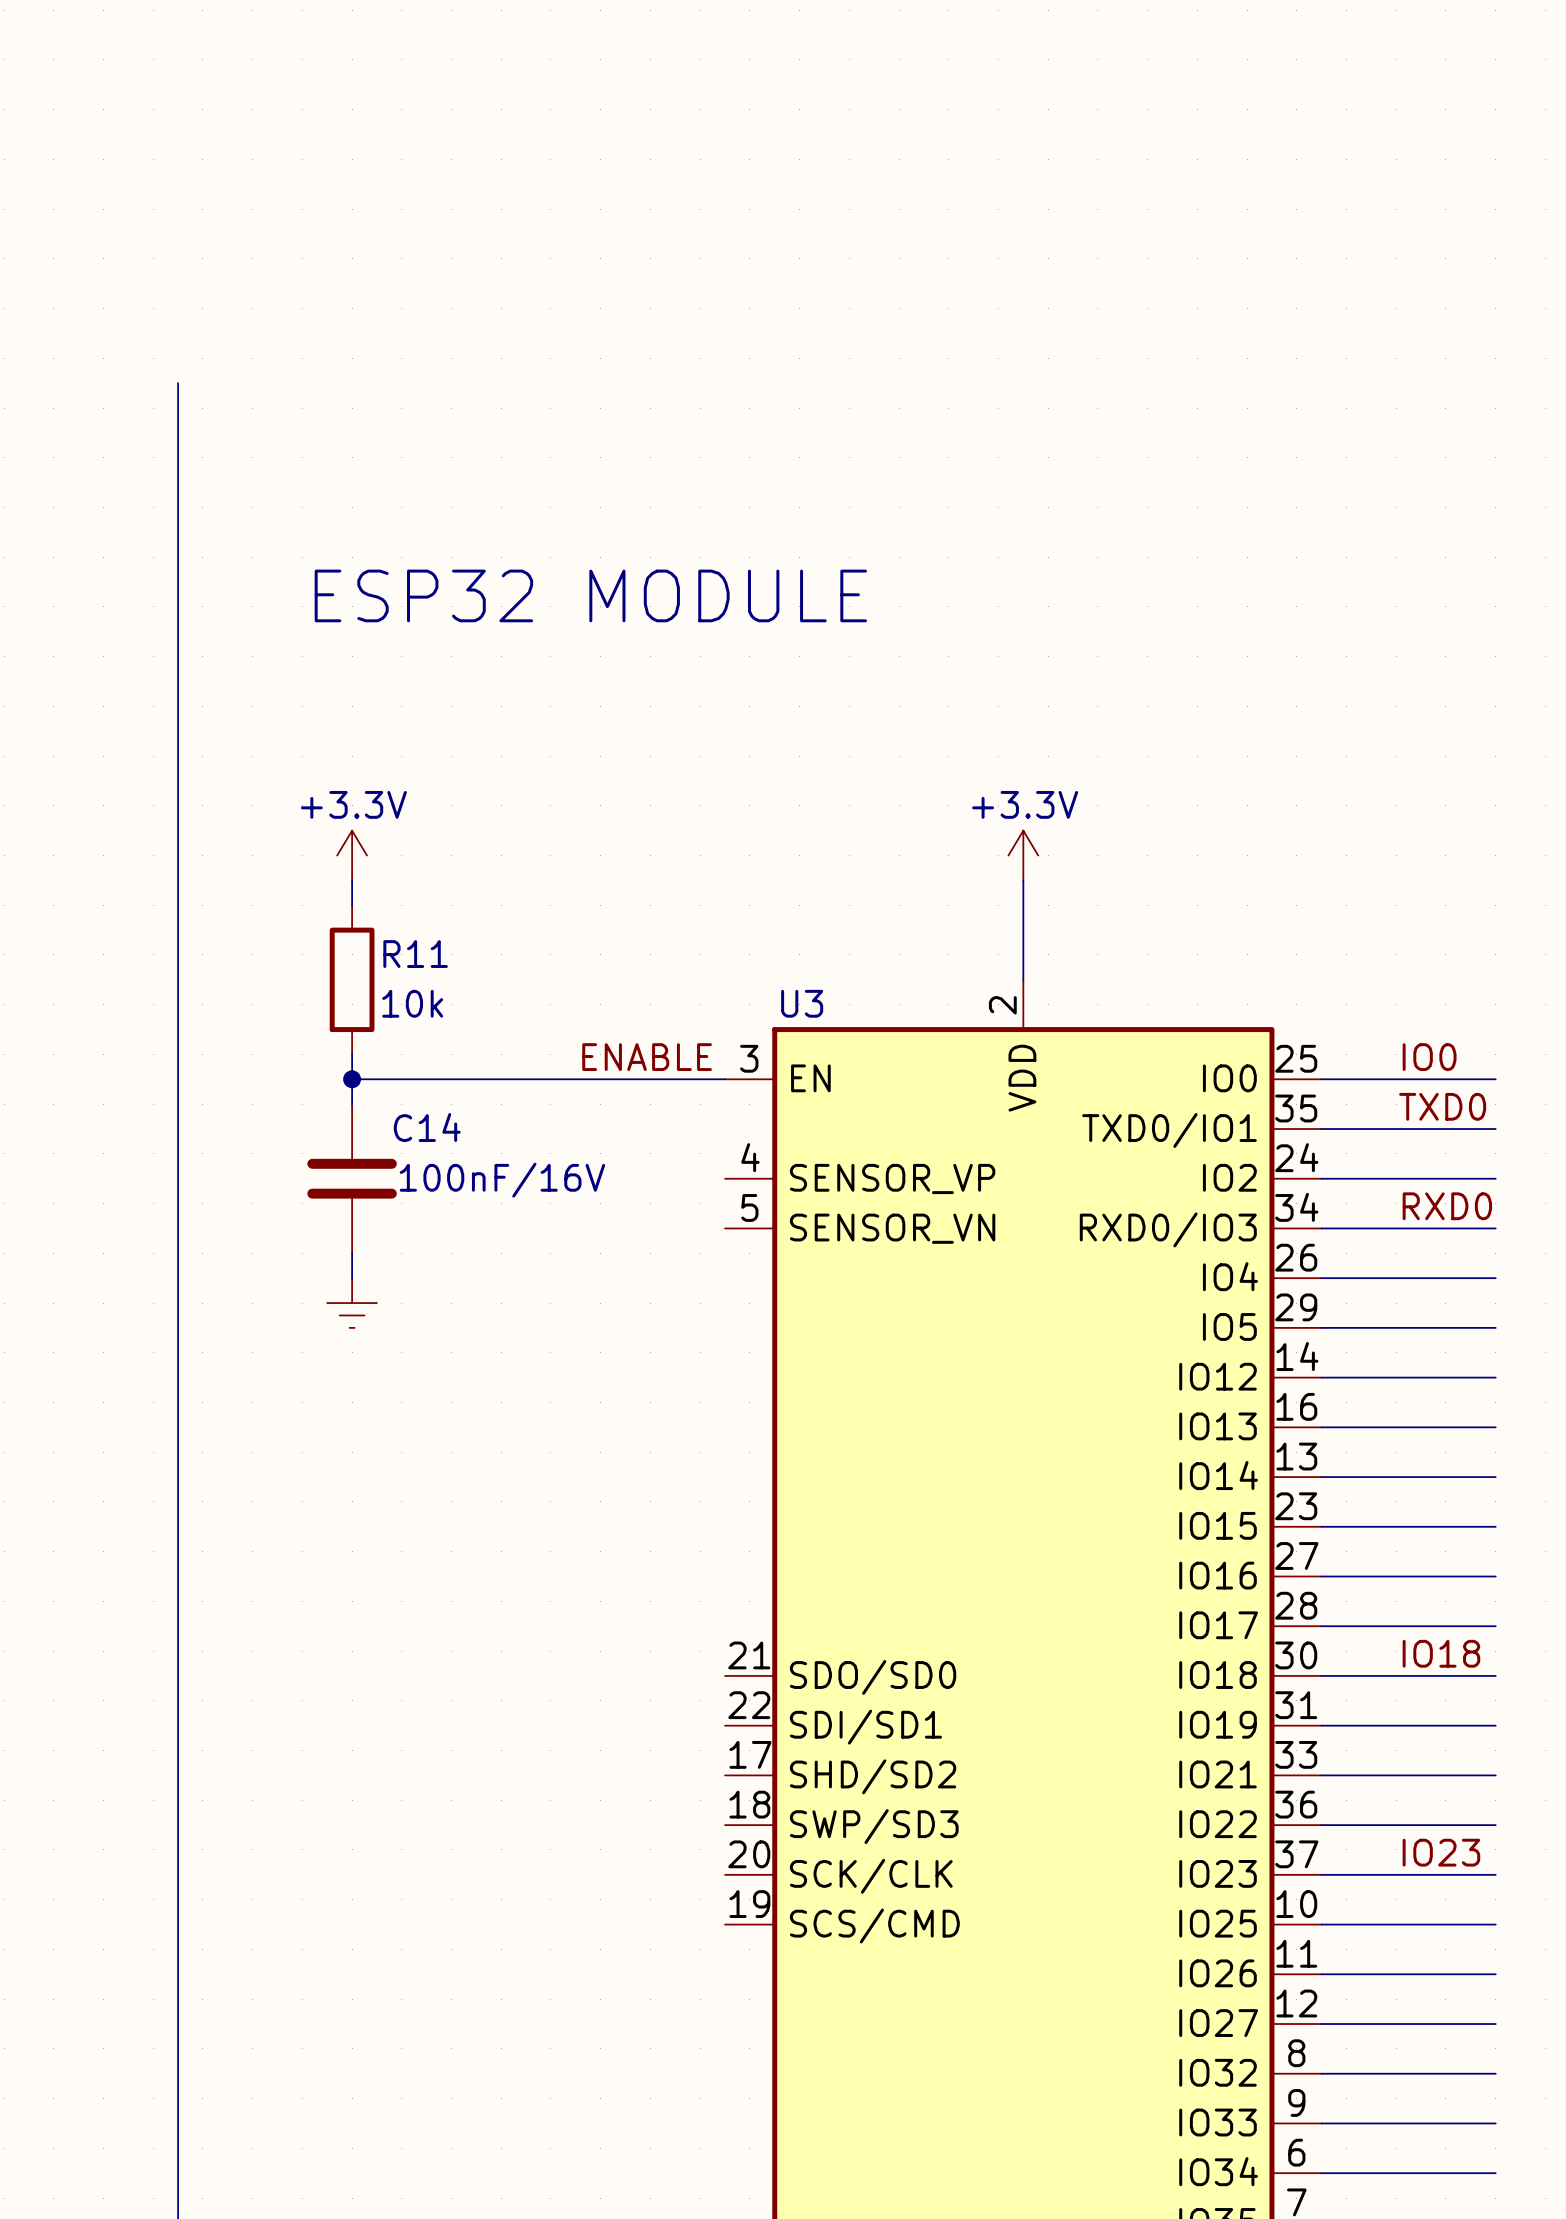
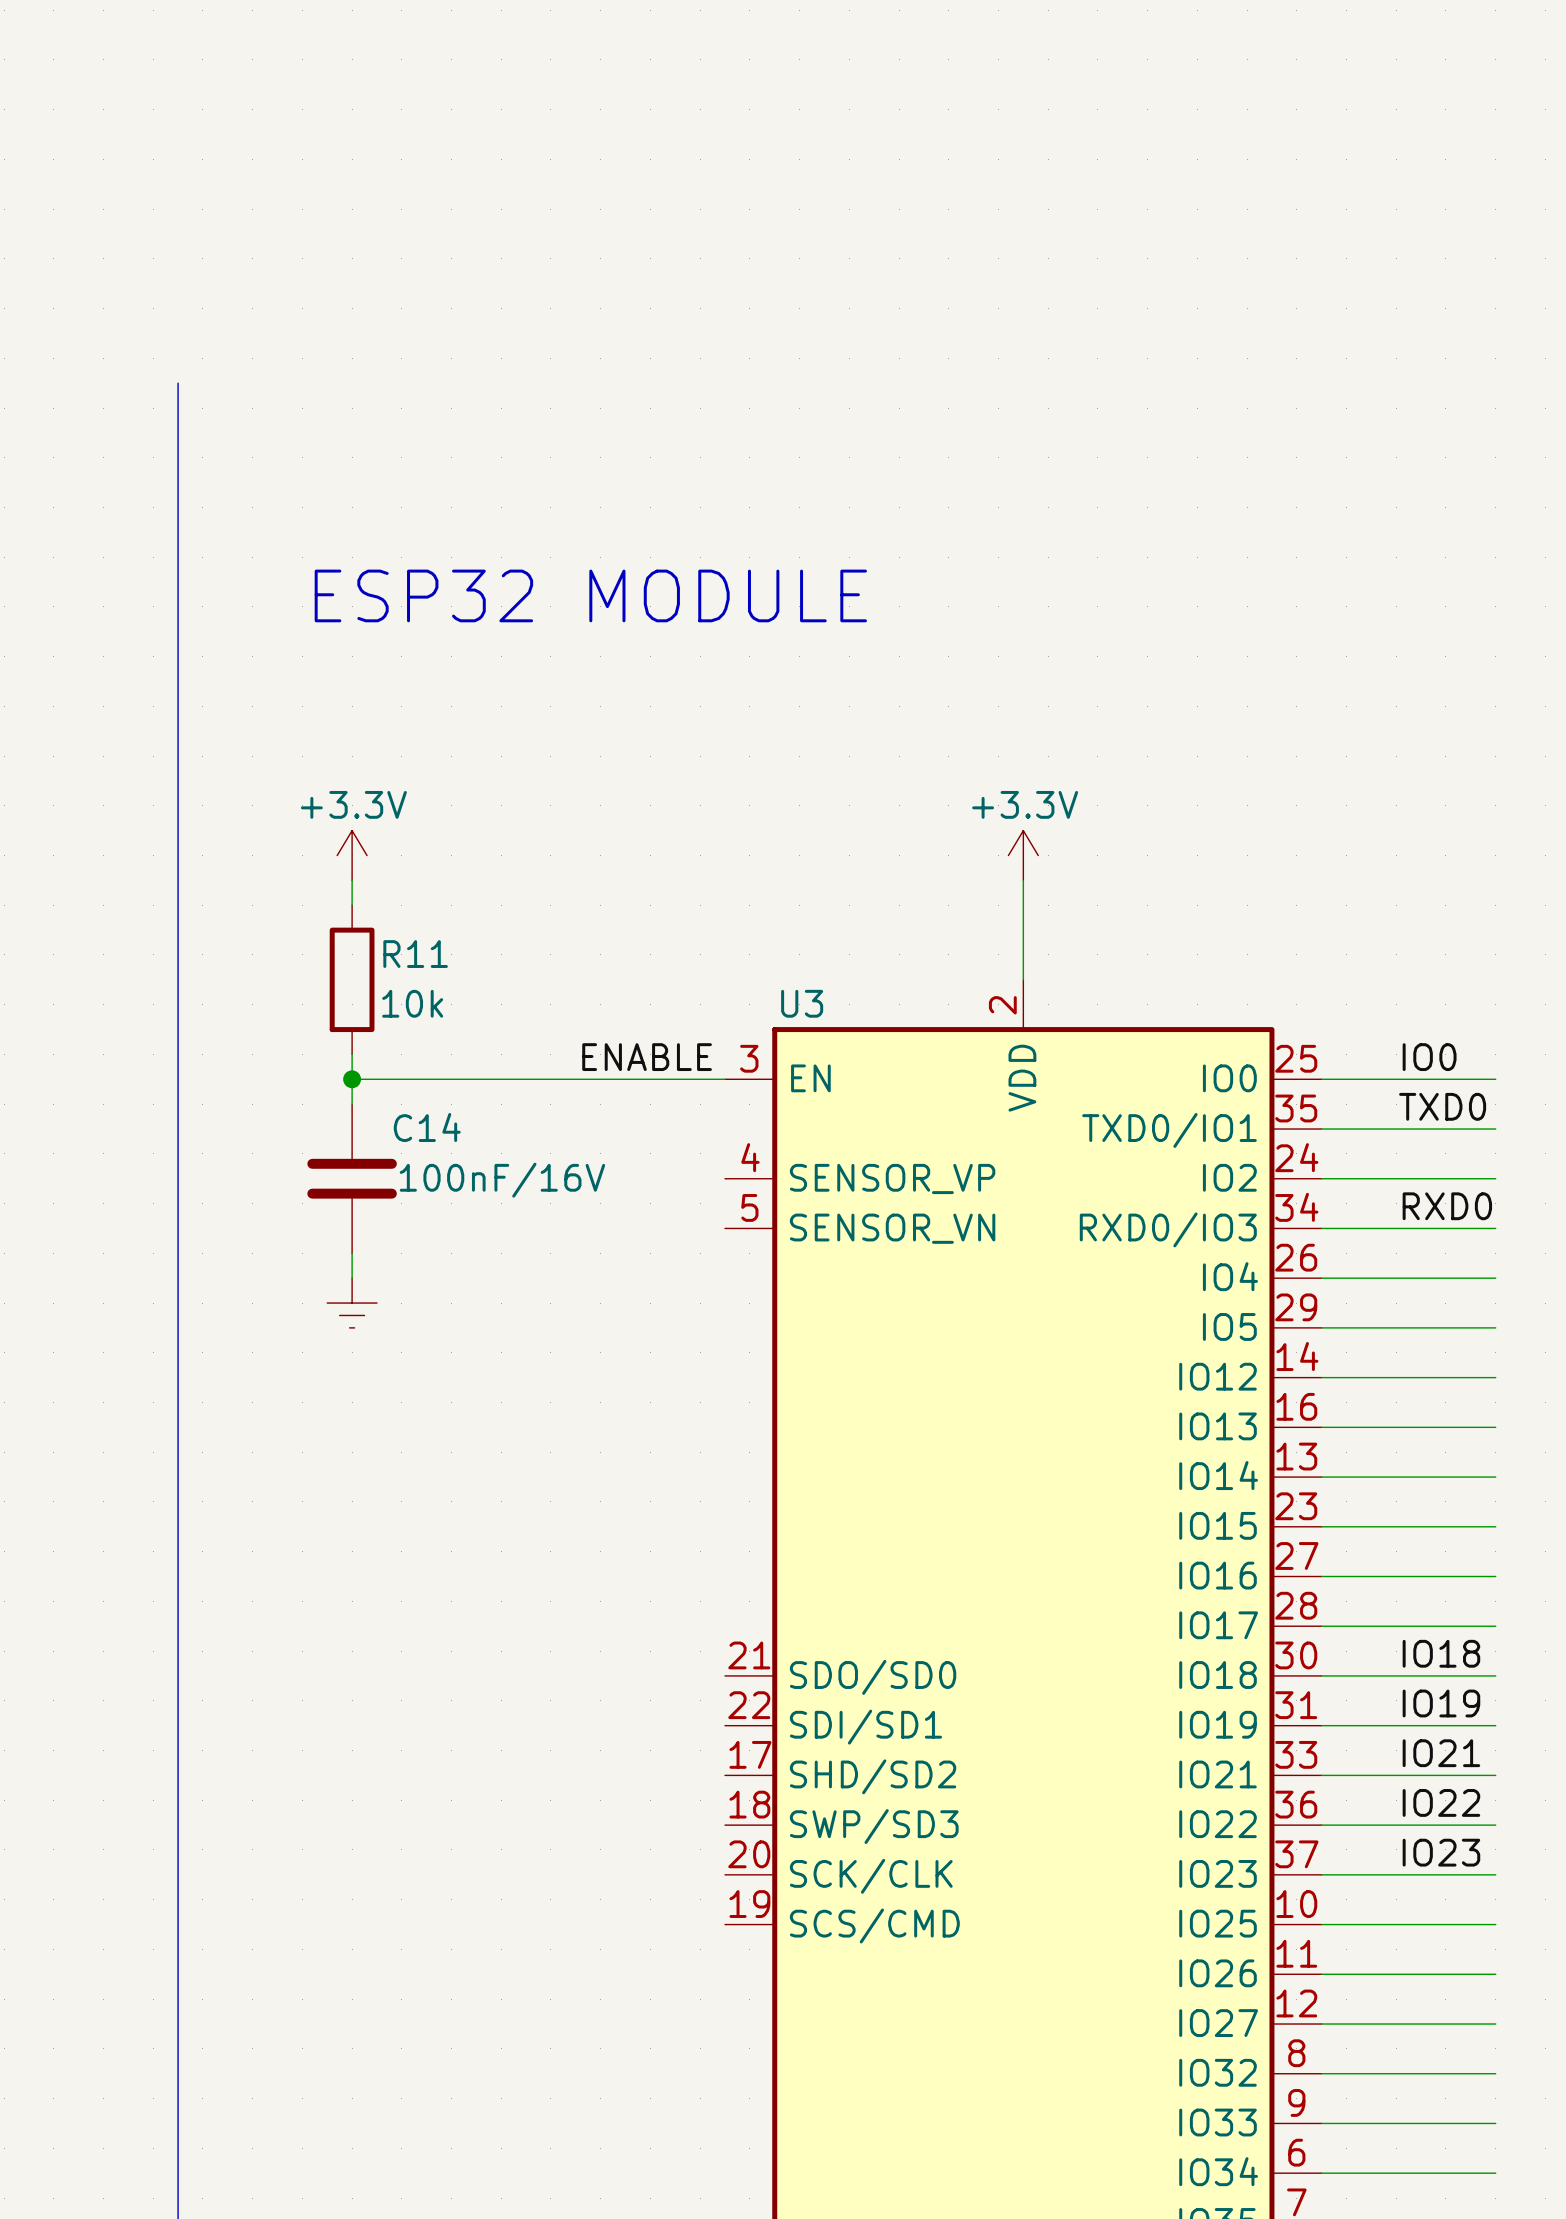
label: none -> IO19 (1441, 1703)
label: none -> IO21 (1441, 1753)
label: none -> IO22 (1441, 1802)

